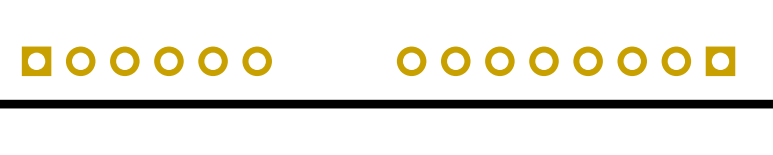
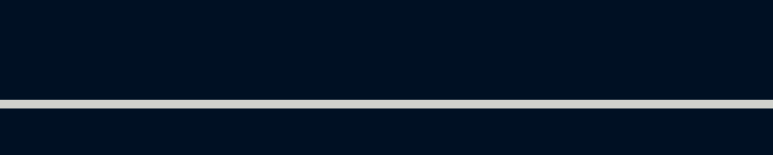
part: (146, 61) -> none
part: (566, 61) -> none

